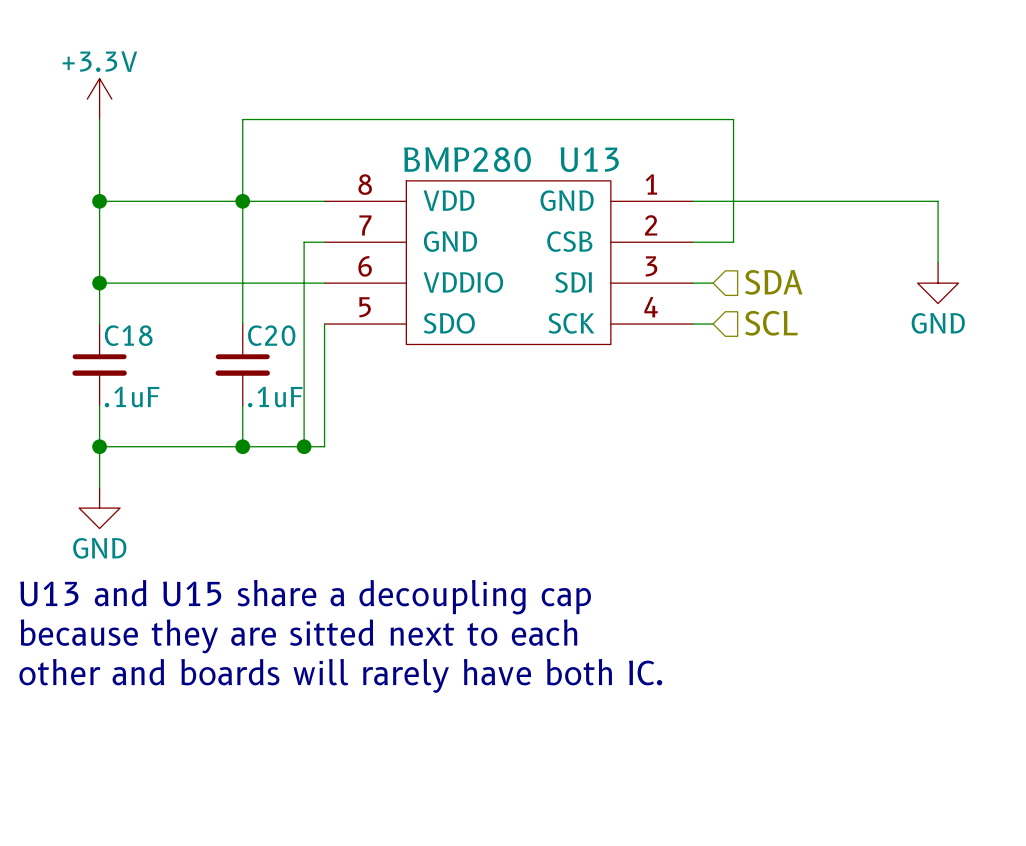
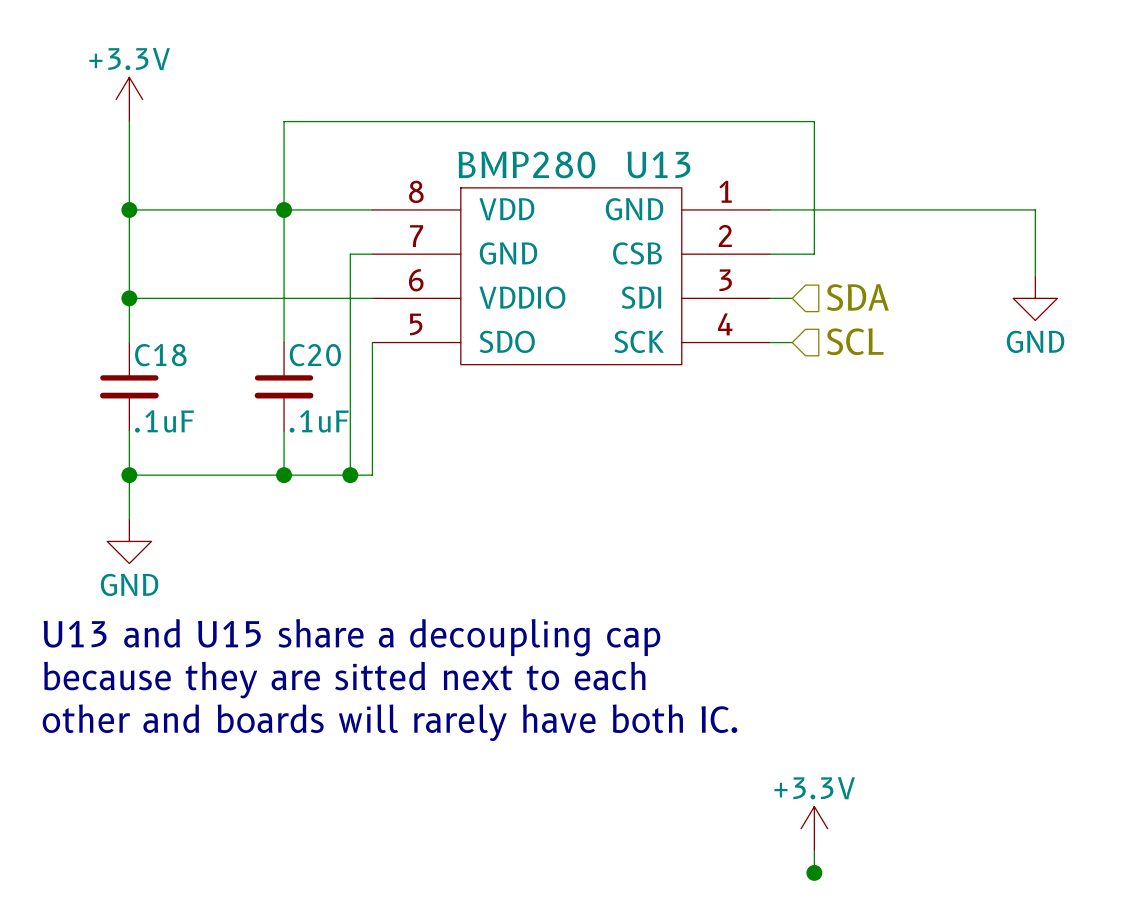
power symbol: none -> +3.3V (814, 828)
wire: none -> (814, 850) (814, 872)
junction: none -> (814, 872)

